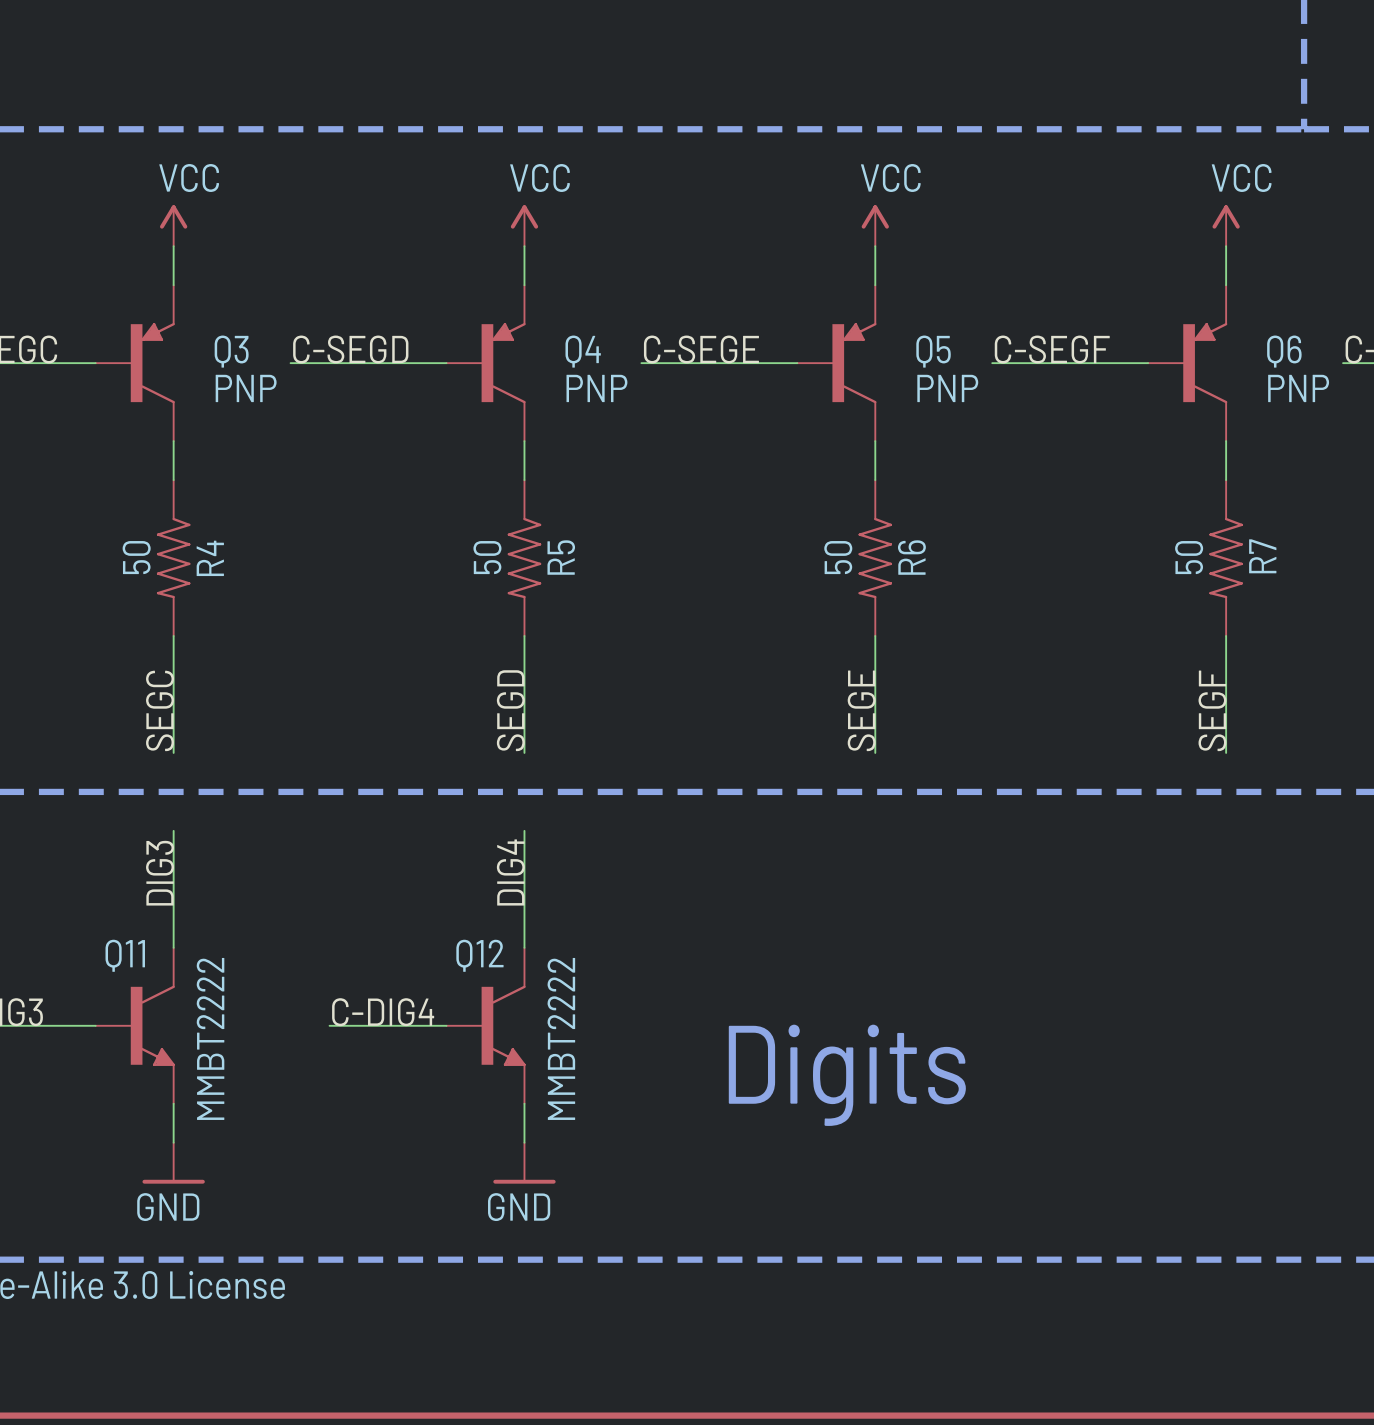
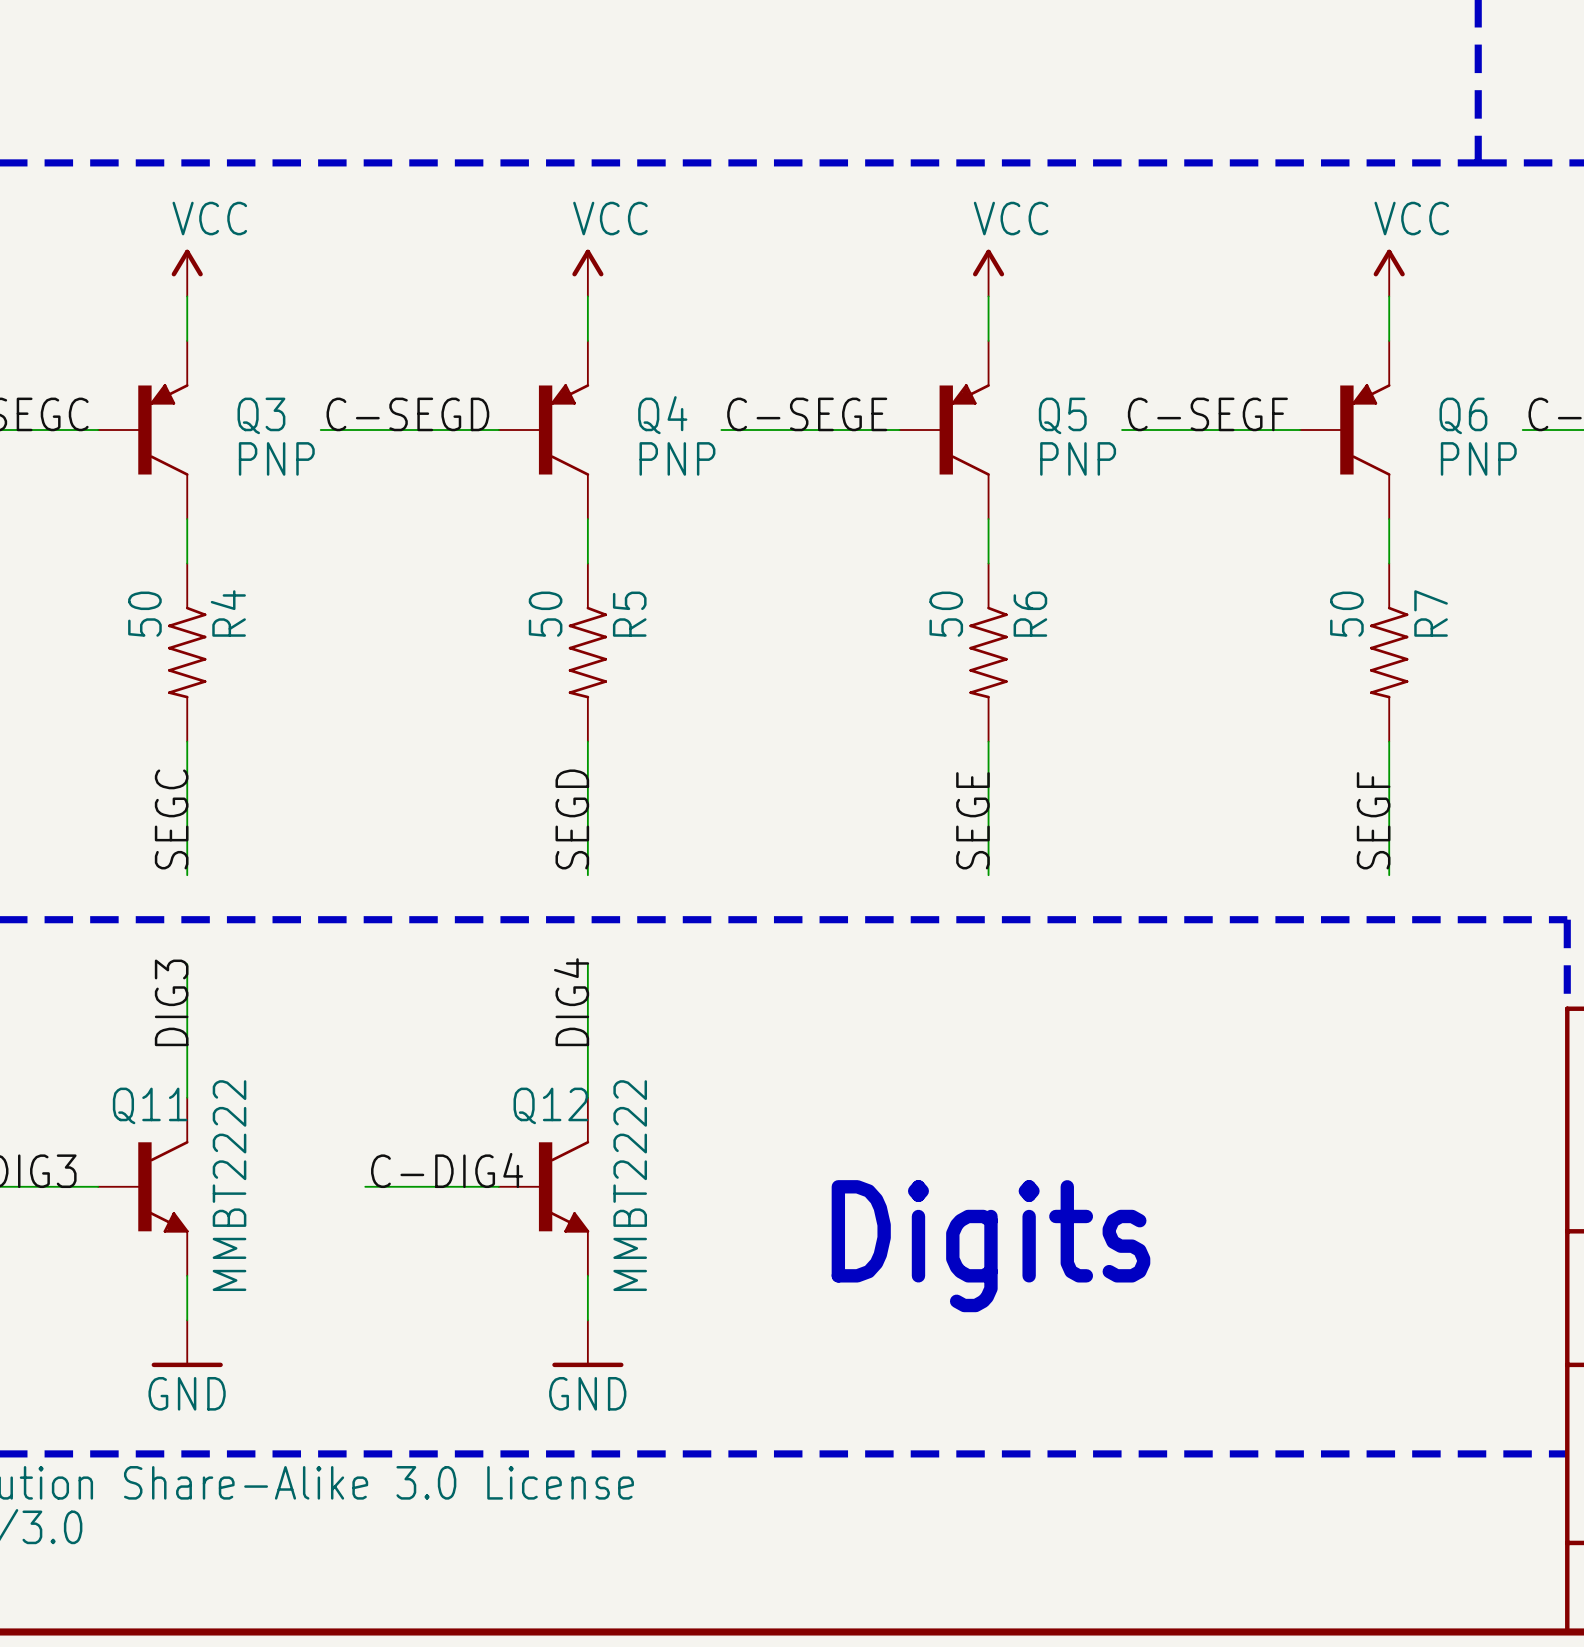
R7 name position: R7 (1262, 556) -> R7 (1431, 613)
R4 value position: 50 (136, 557) -> 50 (144, 614)
R5 value position: 50 (487, 557) -> 50 (545, 614)
R5 name position: R5 (561, 557) -> R5 (629, 614)
R6 value position: 50 (838, 557) -> 50 (946, 614)
R6 name position: R6 (911, 557) -> R6 (1030, 614)
R7 value position: 50 (1189, 557) -> 50 (1346, 614)
R4 name position: R4 (210, 558) -> R4 (228, 613)

